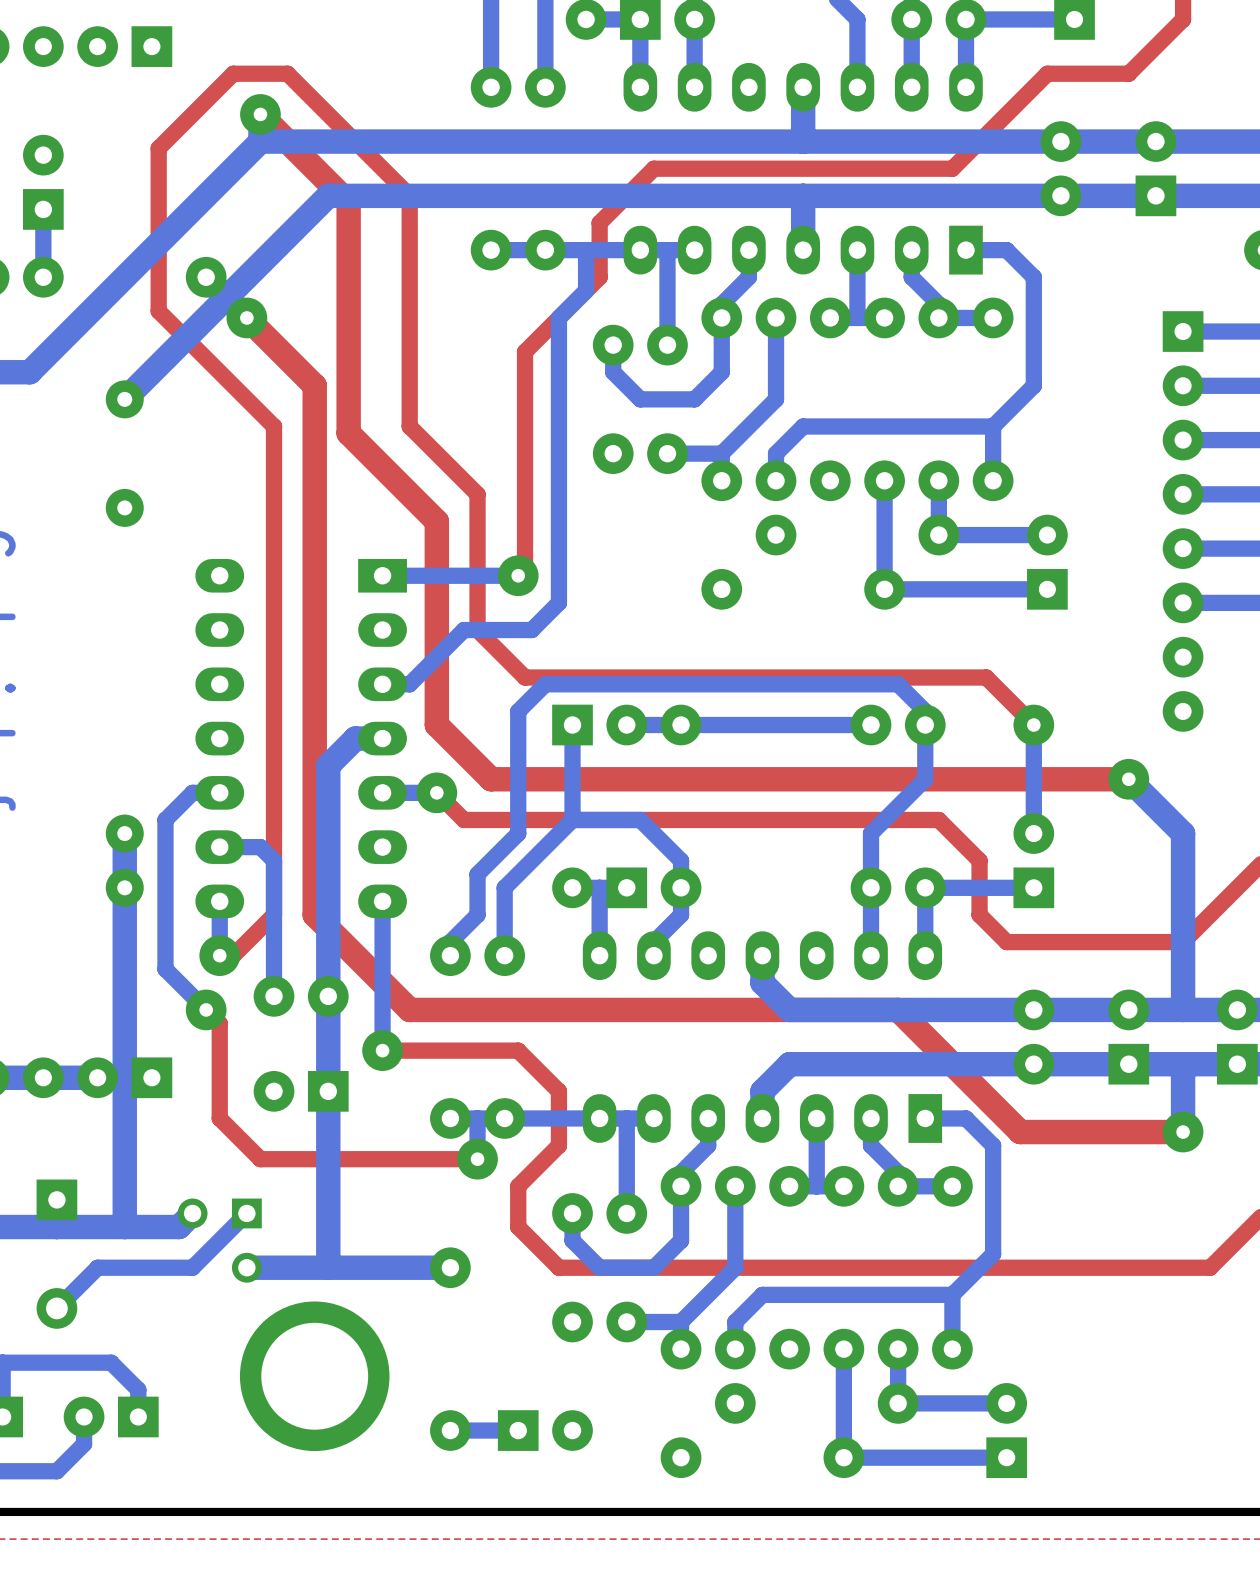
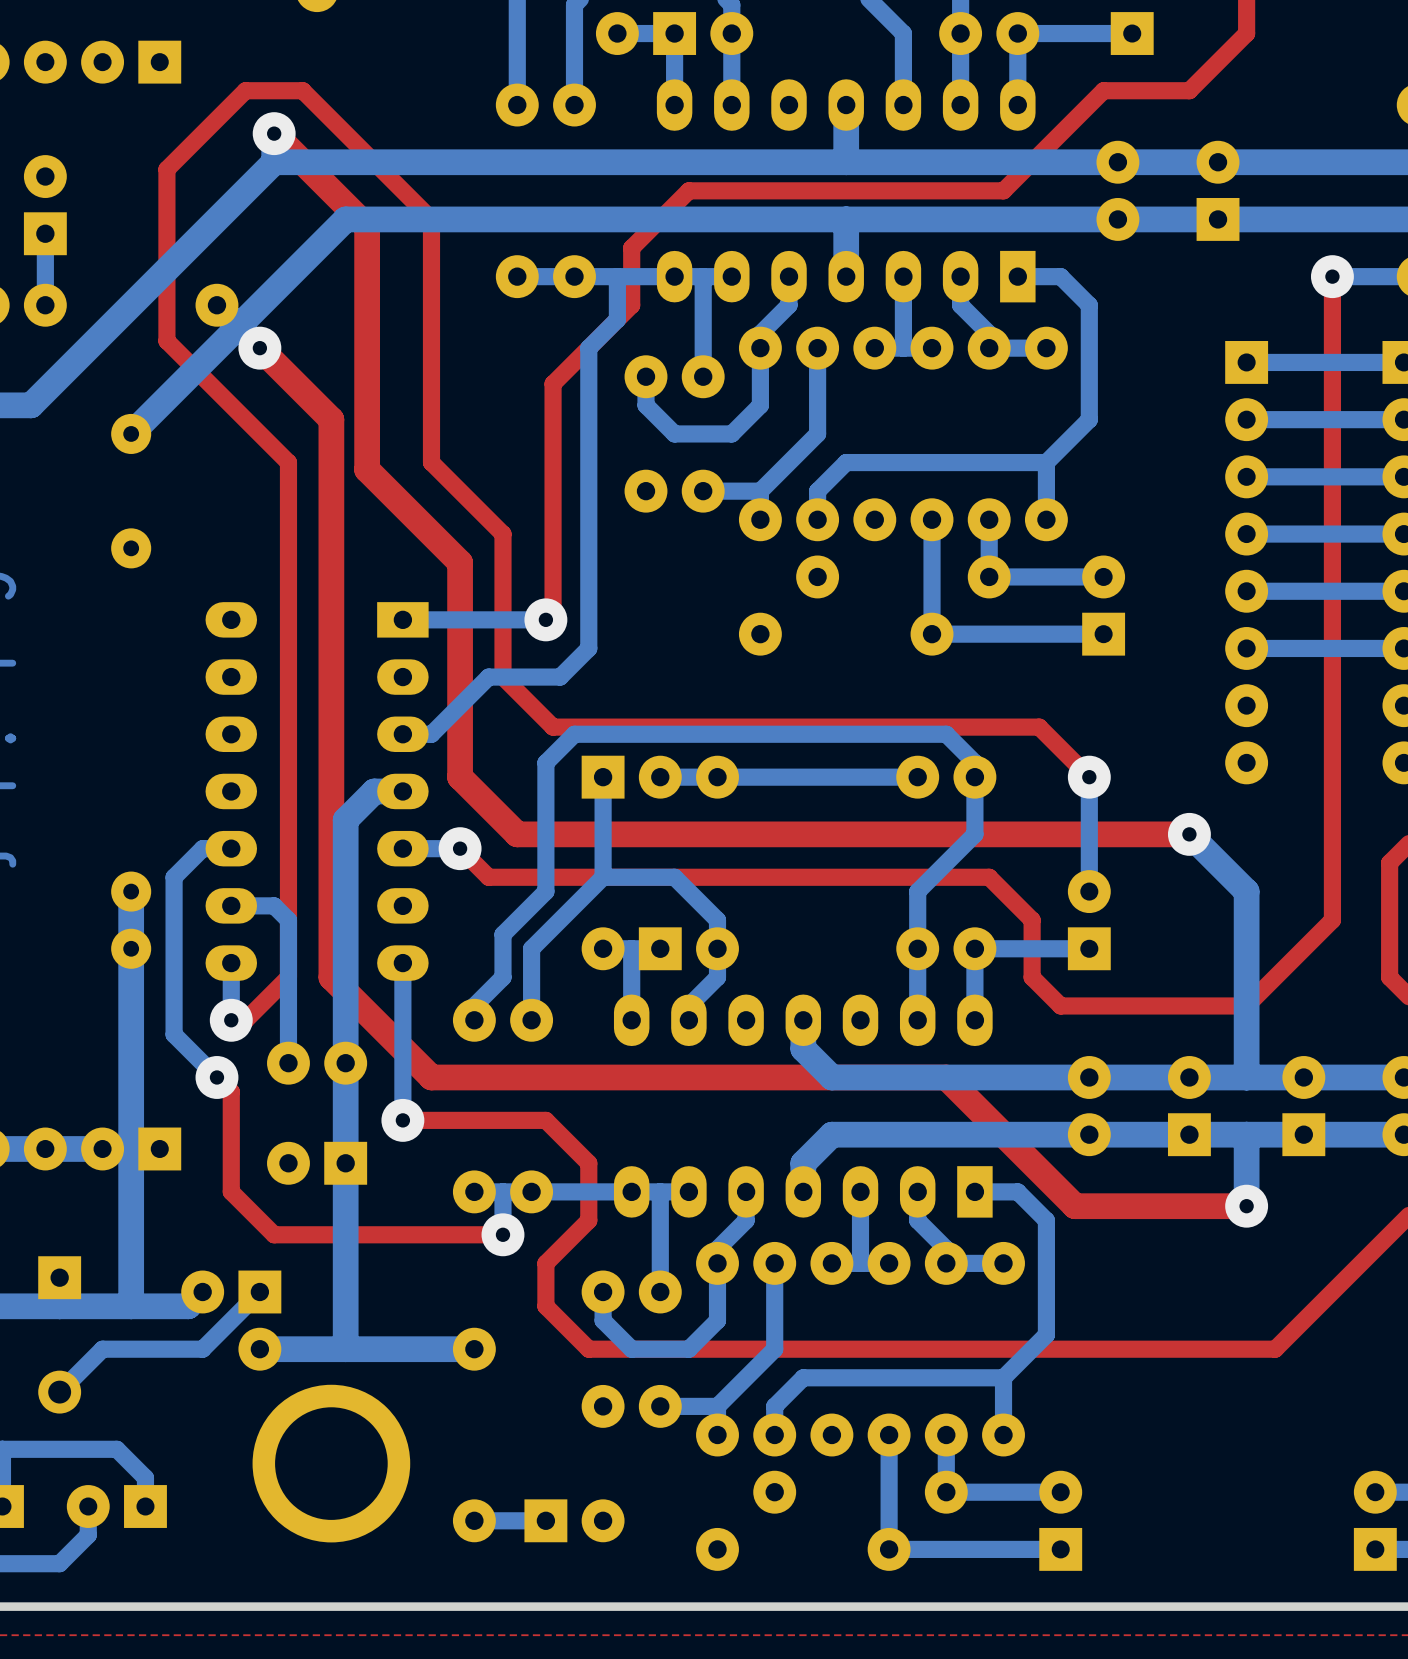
part footprint: [177, 1198, 262, 1283] -> [181, 1270, 282, 1371]

